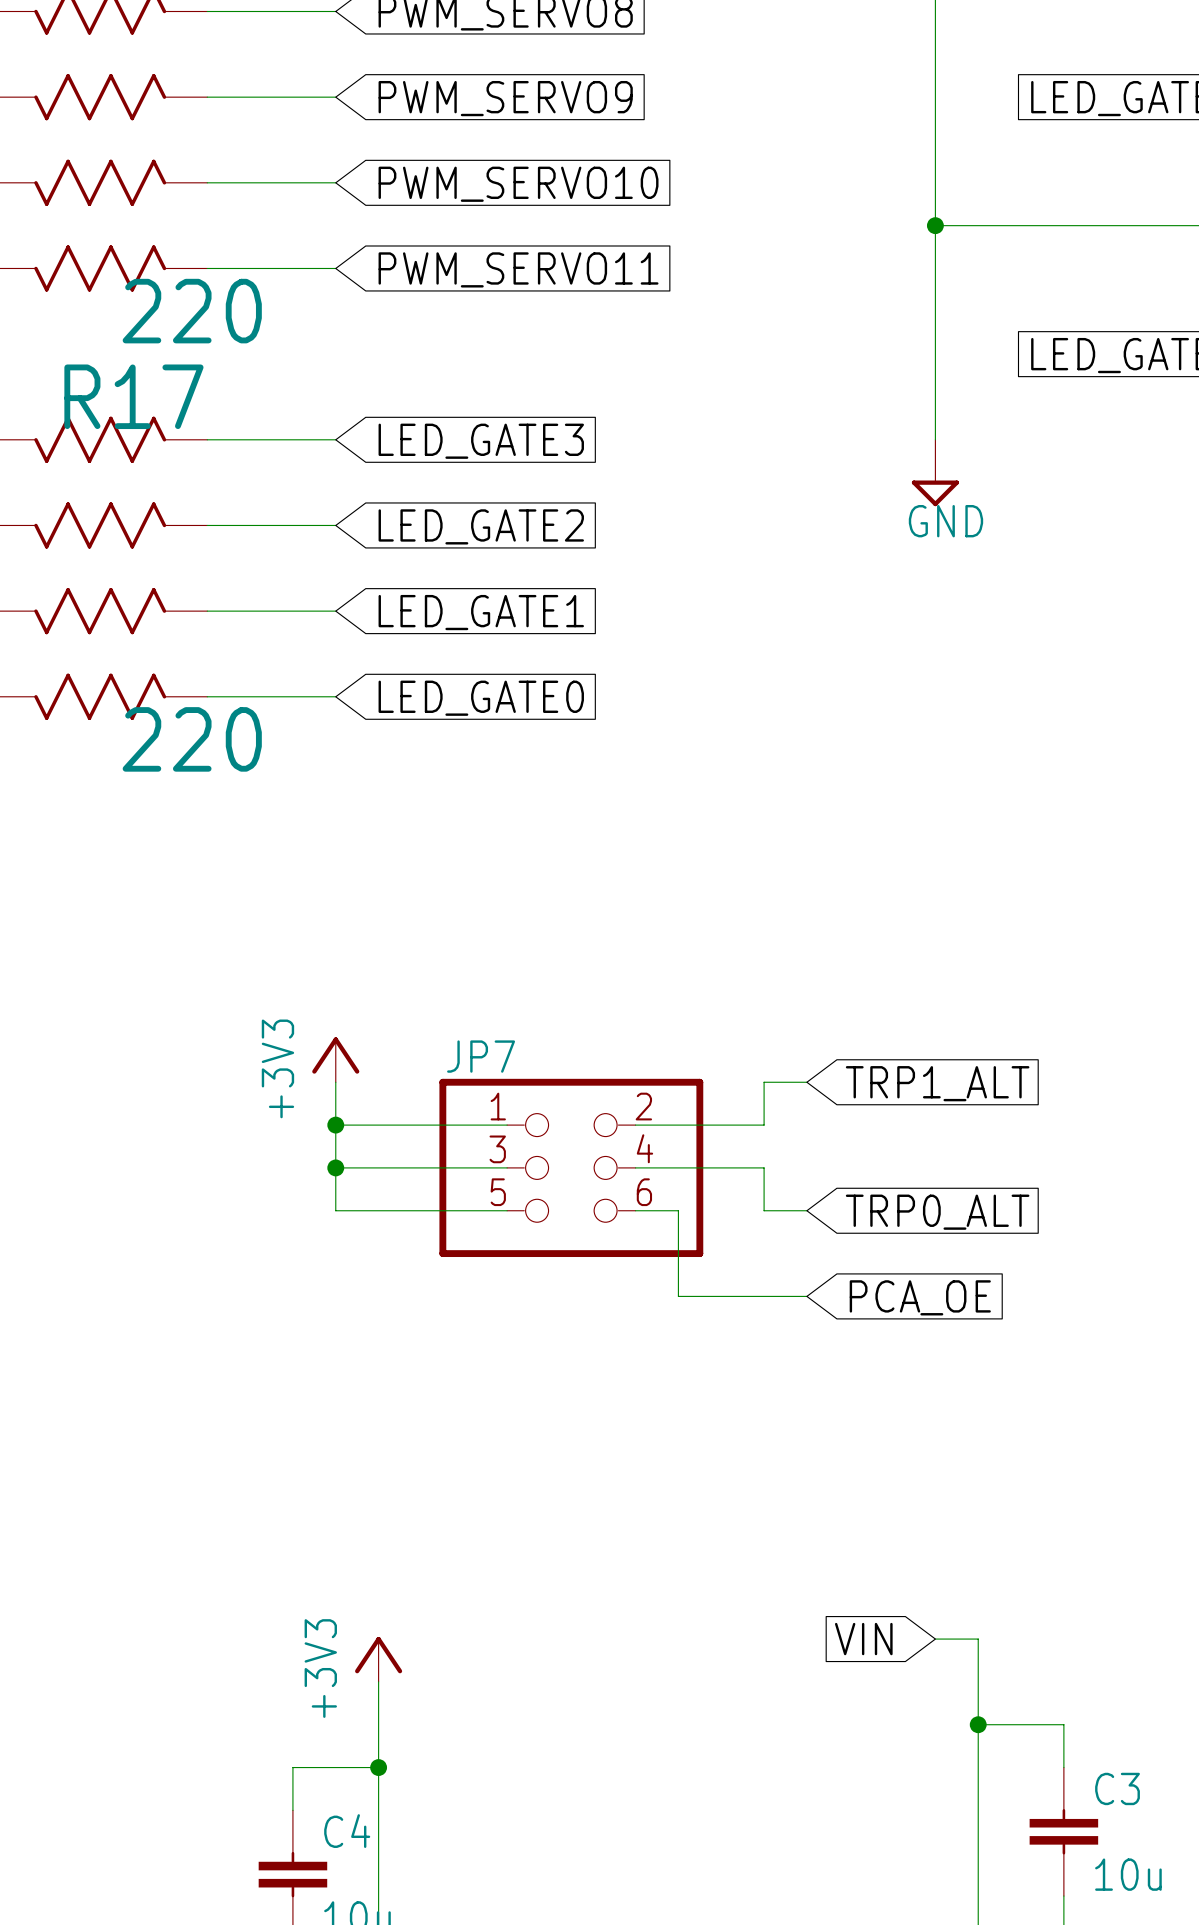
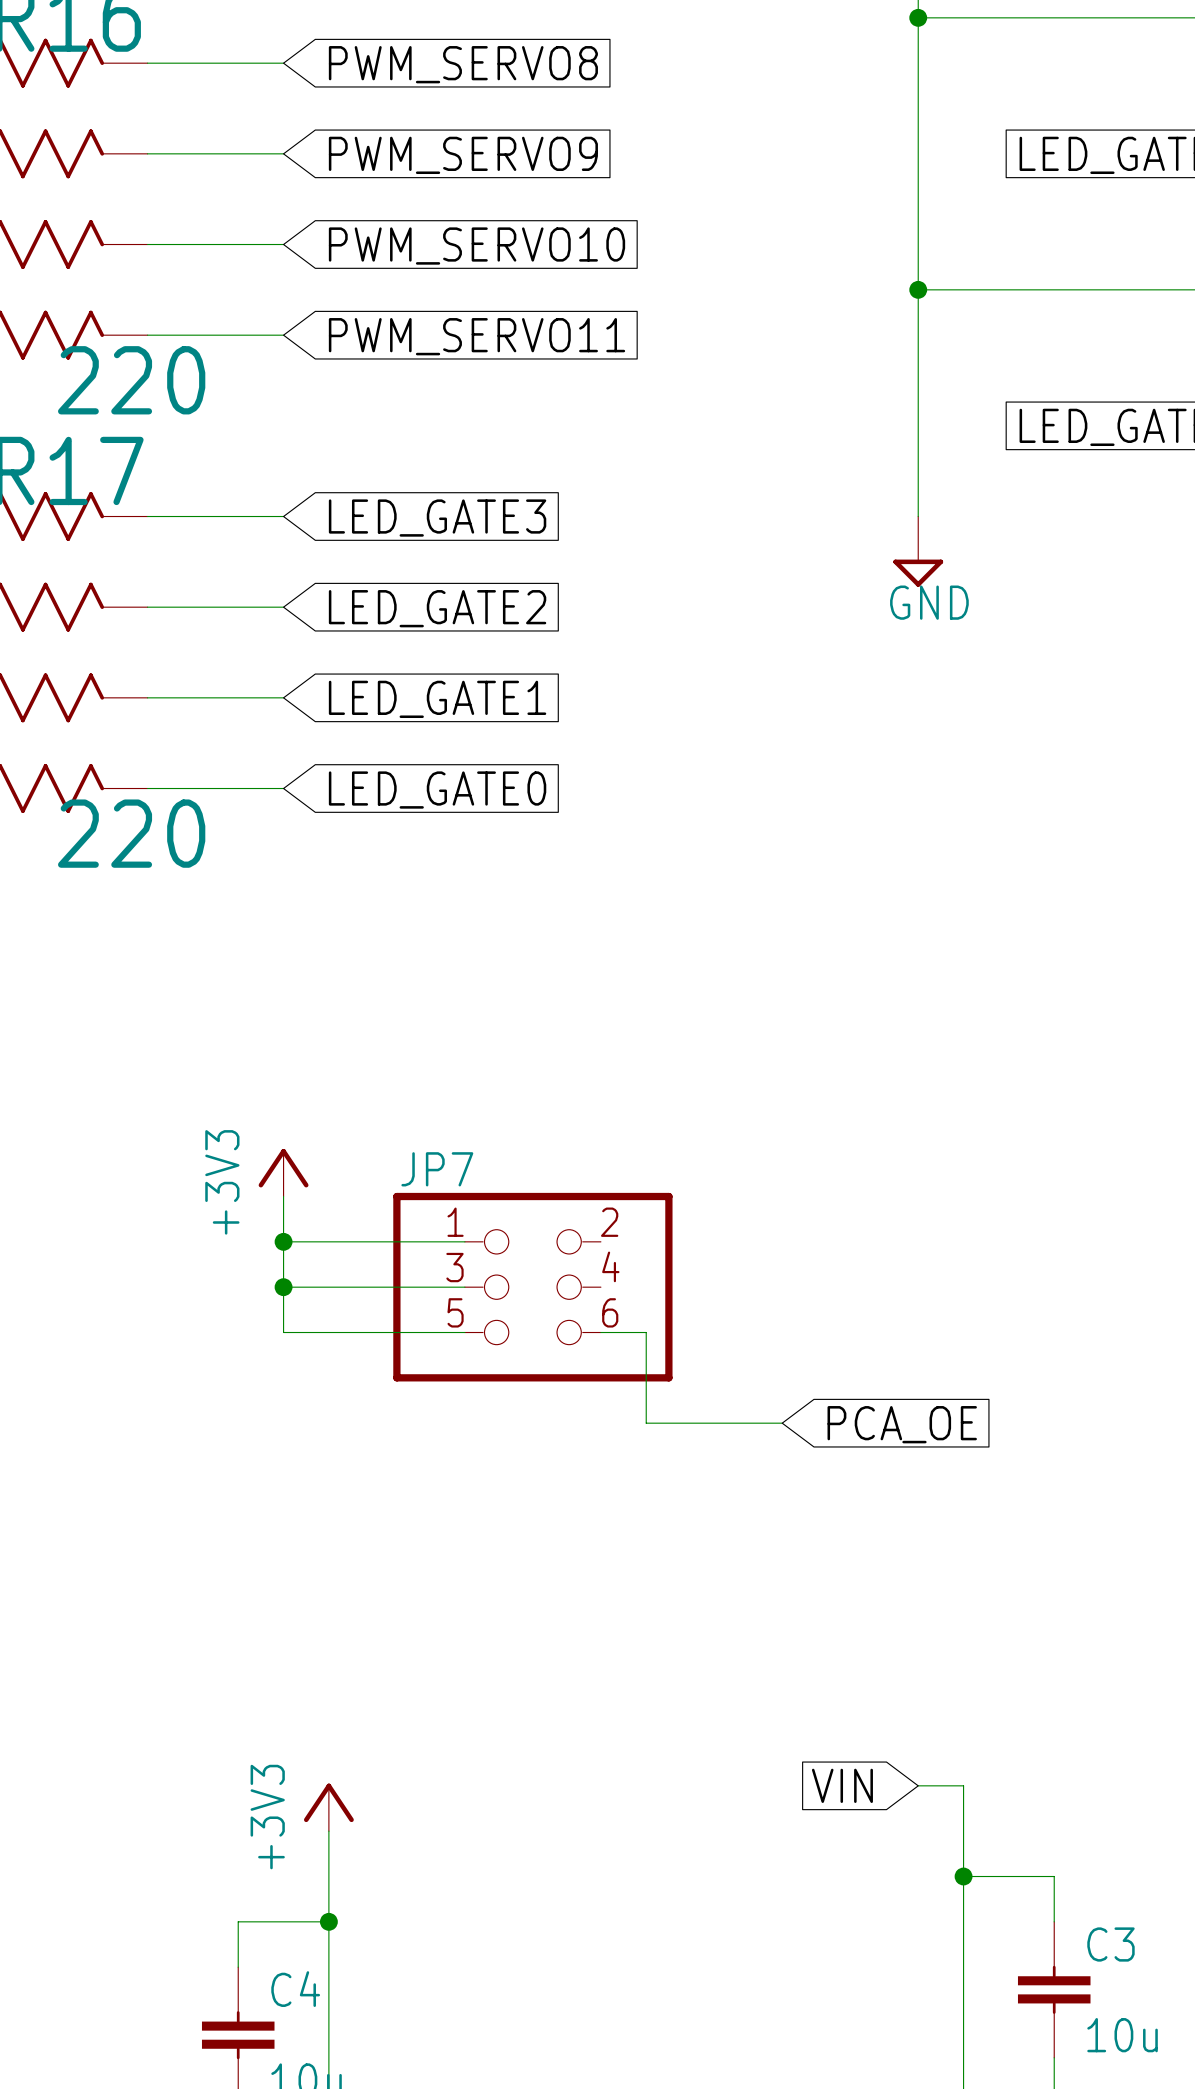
wire: (806, 1082) (764, 1082) (764, 1125) (635, 1125) -> none
global label: TRP1_ALT (937, 1083) -> none
wire: (635, 1167) (764, 1167) (764, 1210) (806, 1210) -> none
global label: TRP0_ALT (937, 1212) -> none

